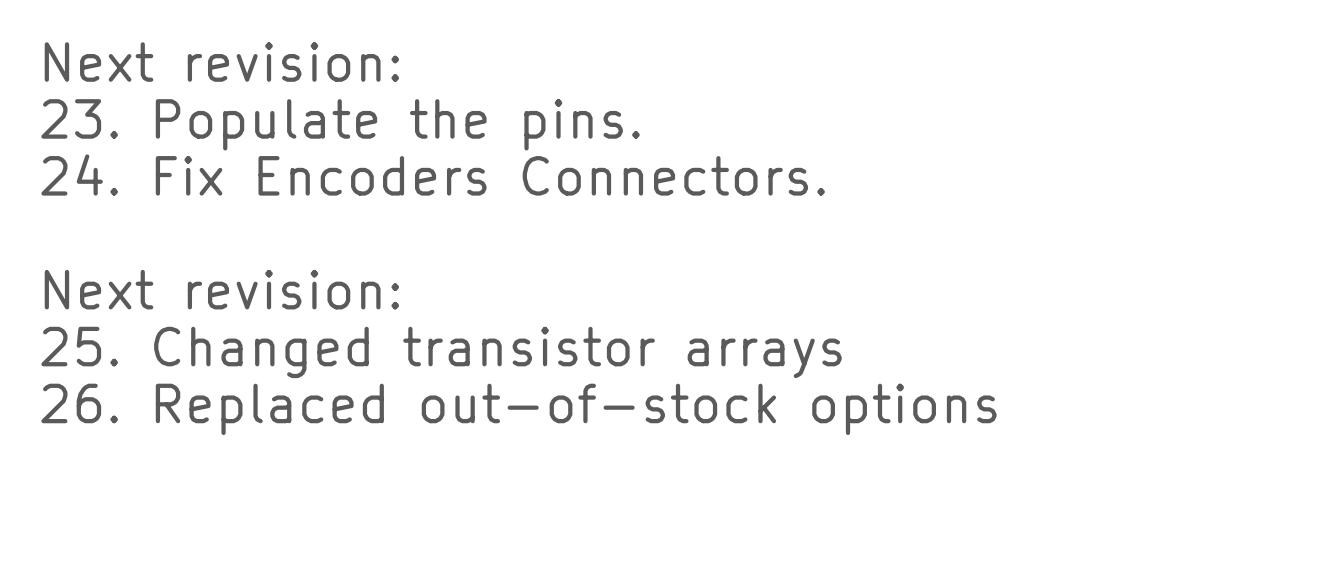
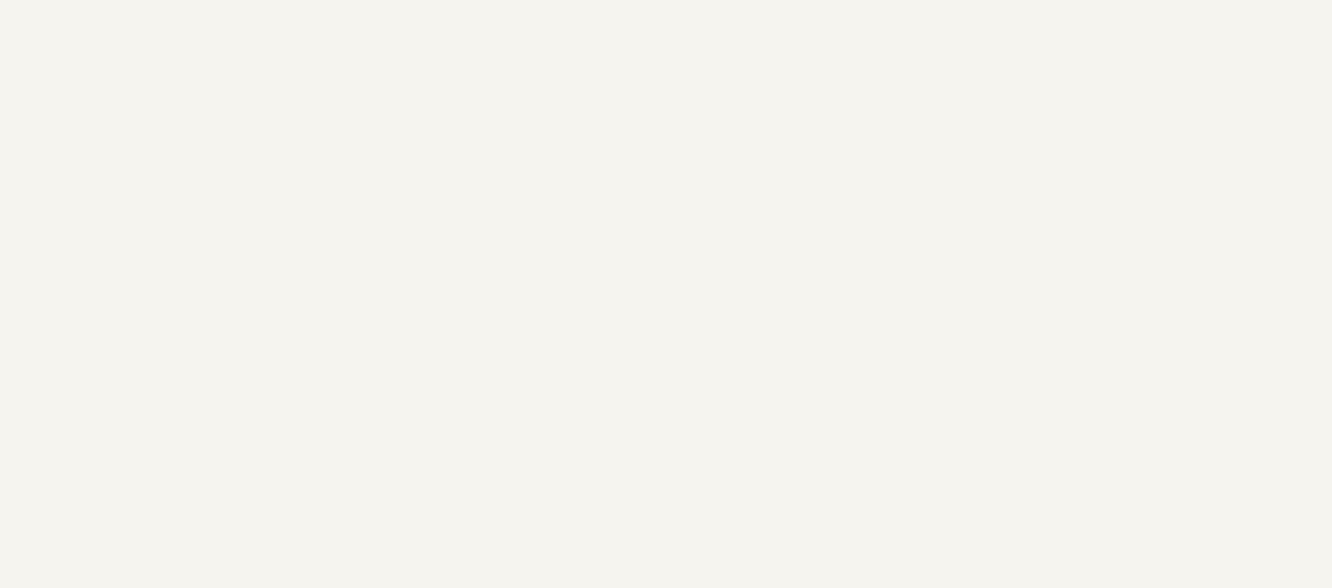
text: Next revision: (221, 62) -> none
text: 23. Populate the pins. (340, 124) -> none
text: 24. Fix Encoders Connectors. (433, 174) -> none
text: Next revision: (221, 289) -> none
text: 25. Changed transistor arrays (441, 352) -> none
text: 26. Replaced out-of-stock options (518, 409) -> none

